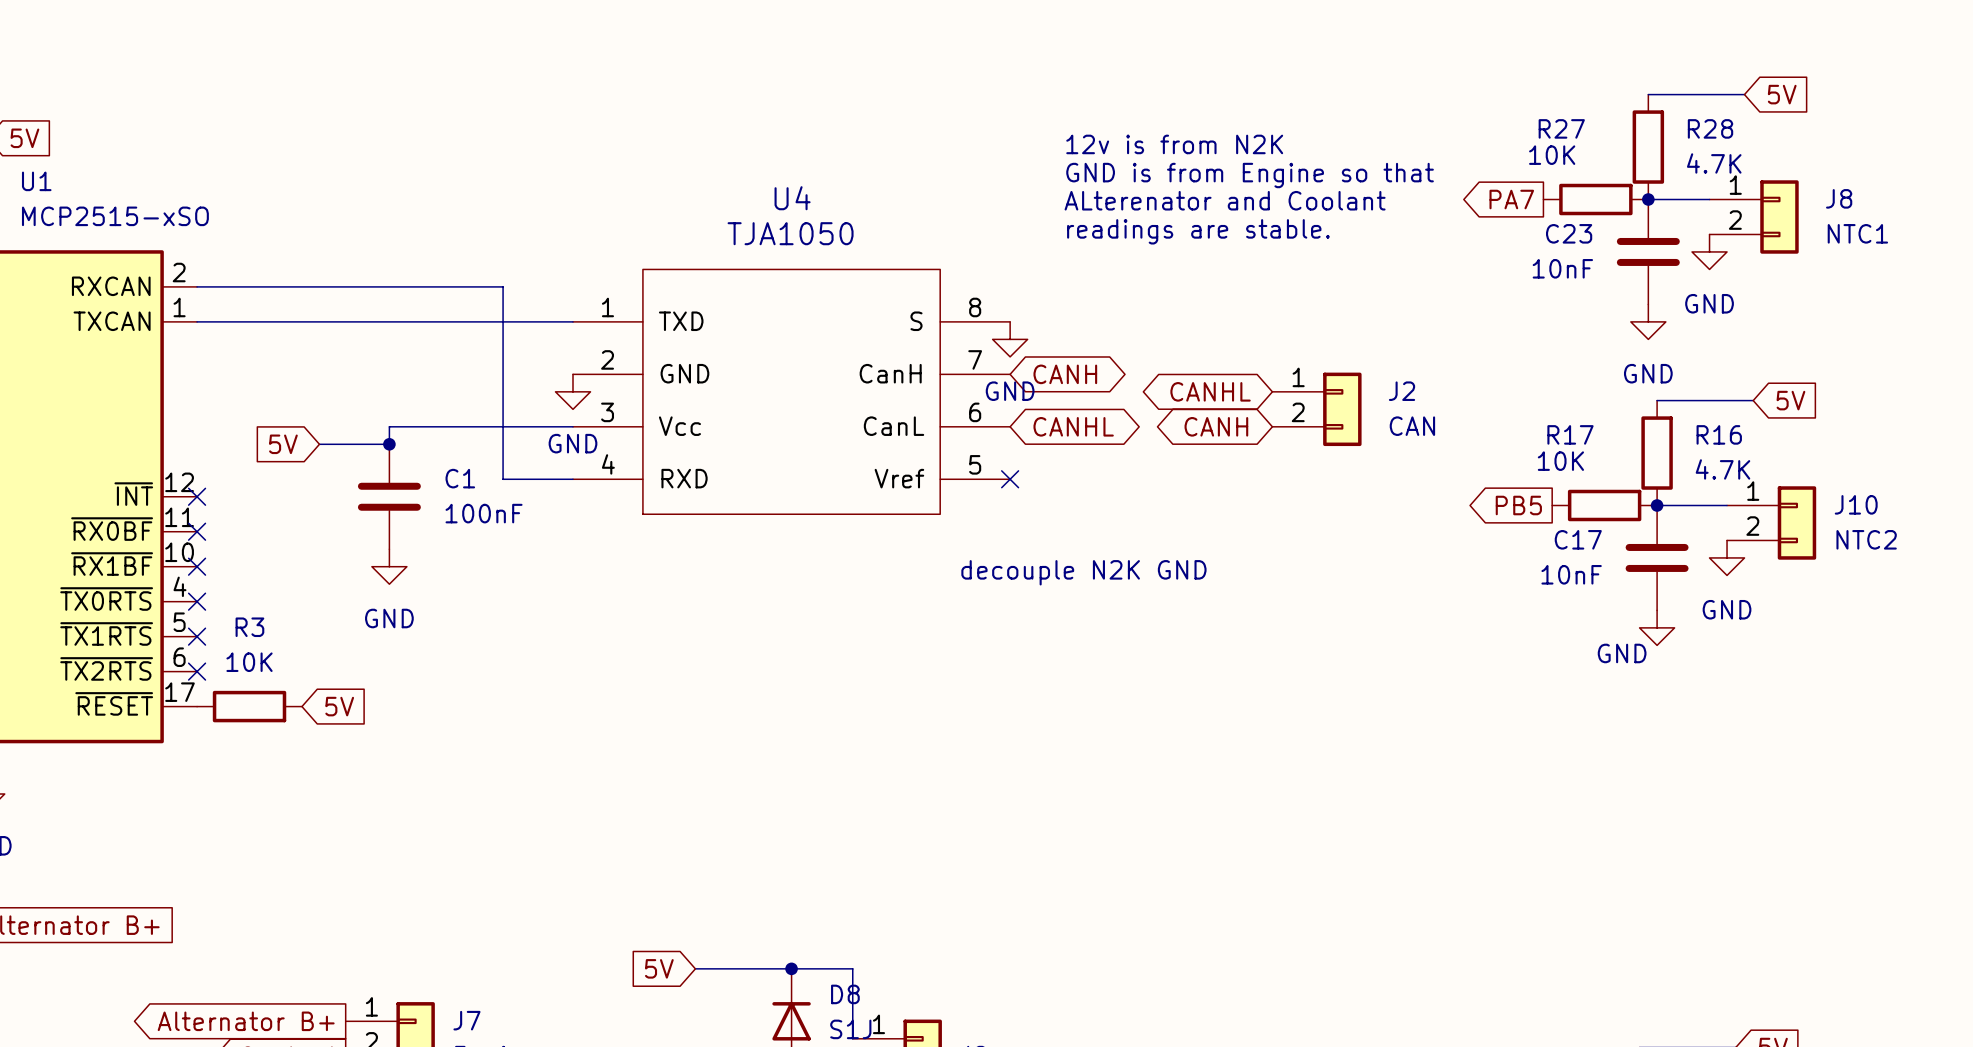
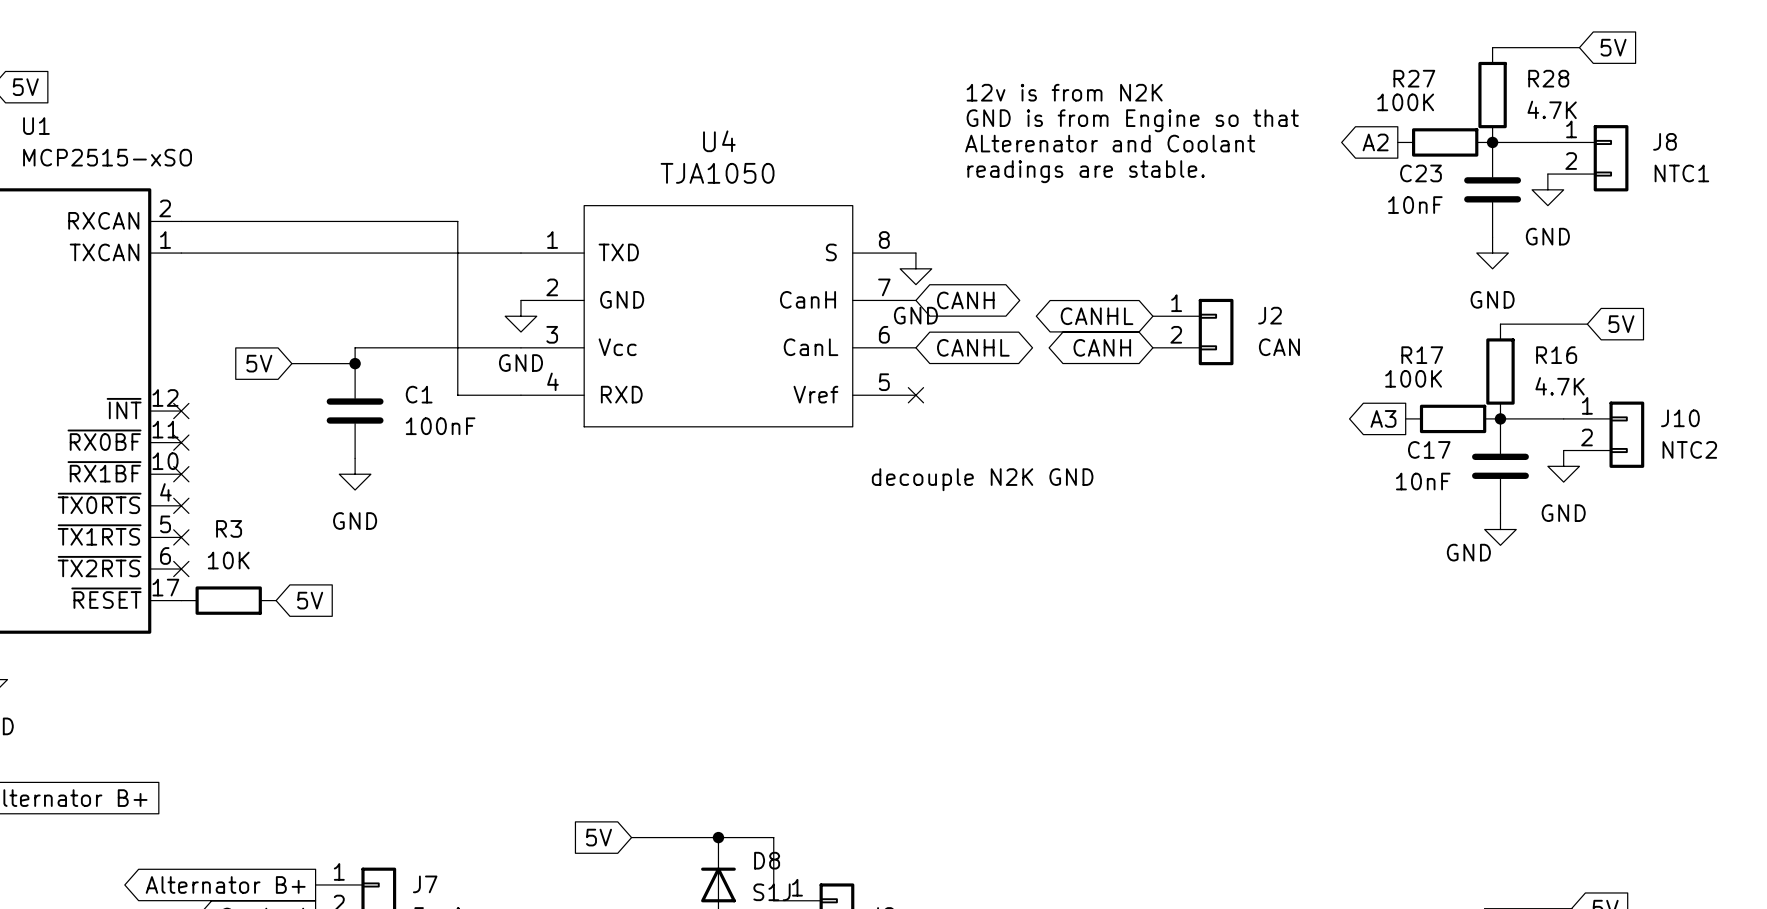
R27 value: 10K (1552, 155) -> 100K (1405, 102)
global label: PA7 (1511, 199) -> A2 (1375, 142)
R17 value: 10K (1560, 461) -> 100K (1413, 378)
global label: PB5 (1518, 505) -> A3 (1383, 418)

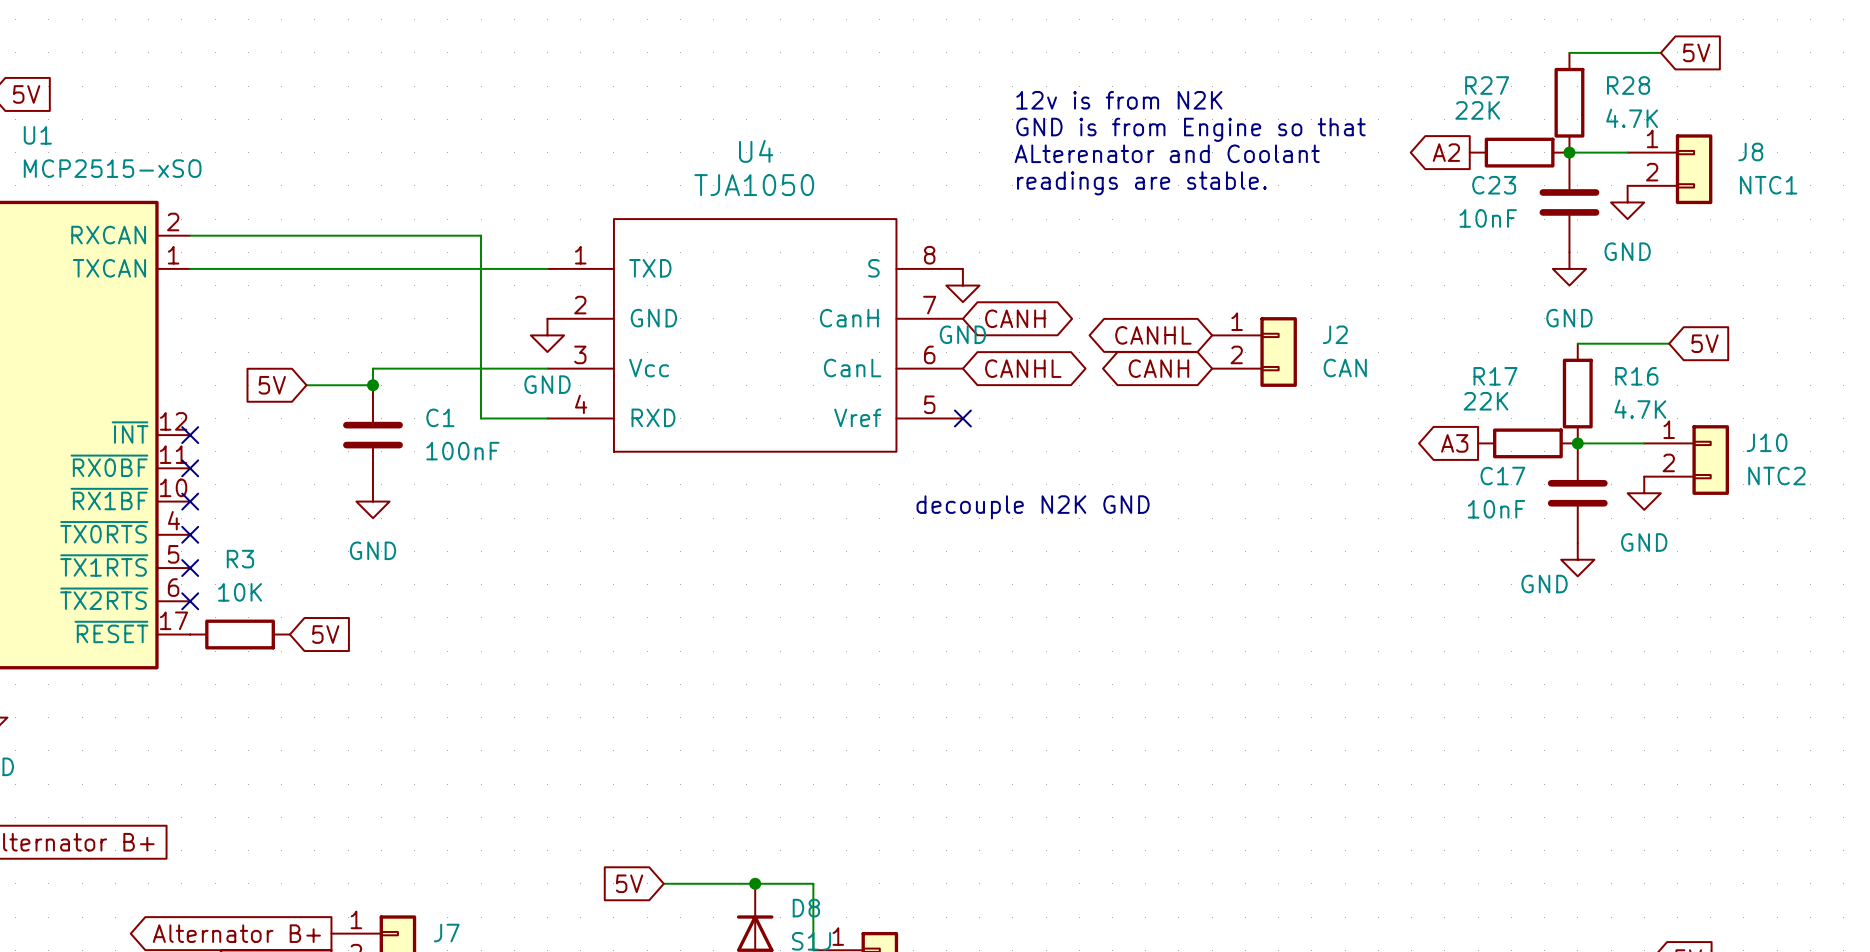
R27 value: 100K (1405, 102) -> 22K (1477, 110)
R17 value: 100K (1413, 378) -> 22K (1485, 401)

